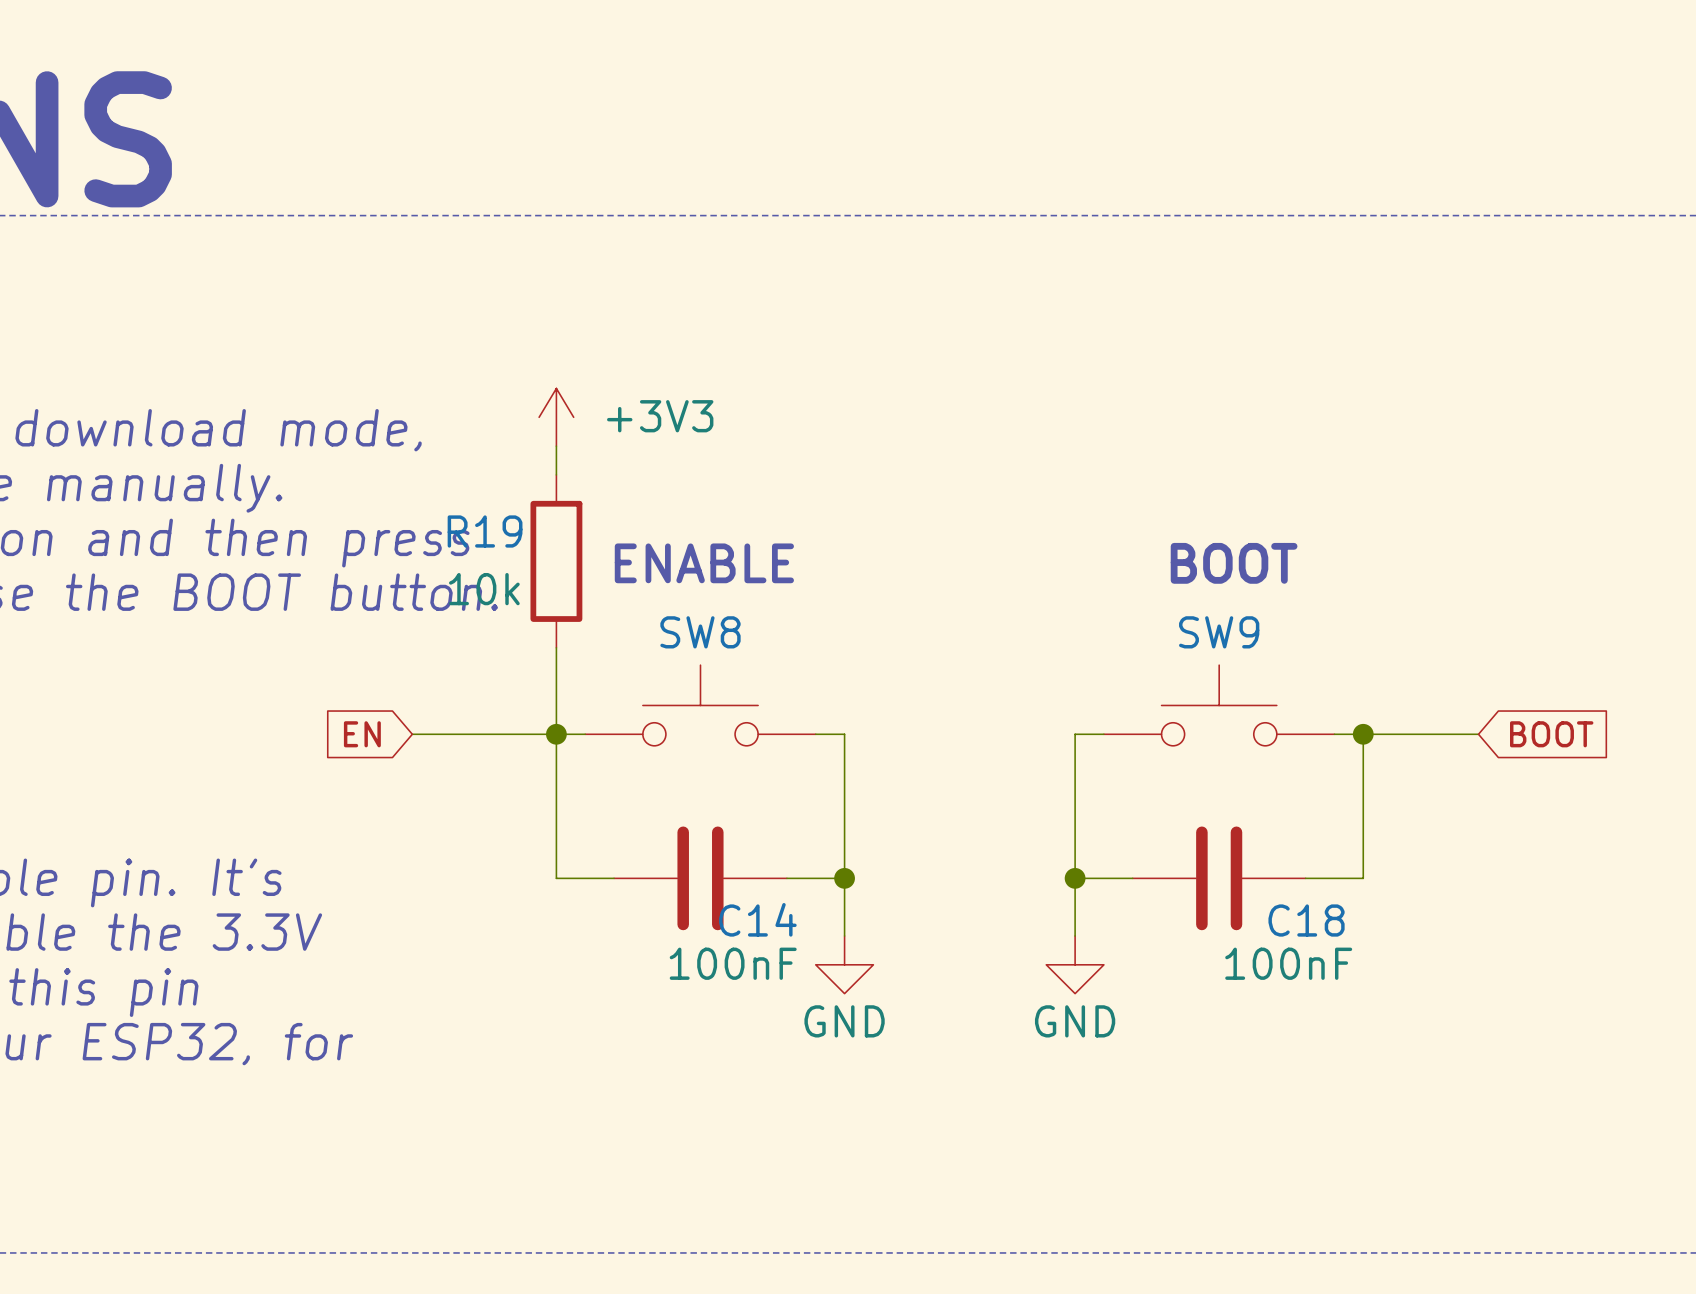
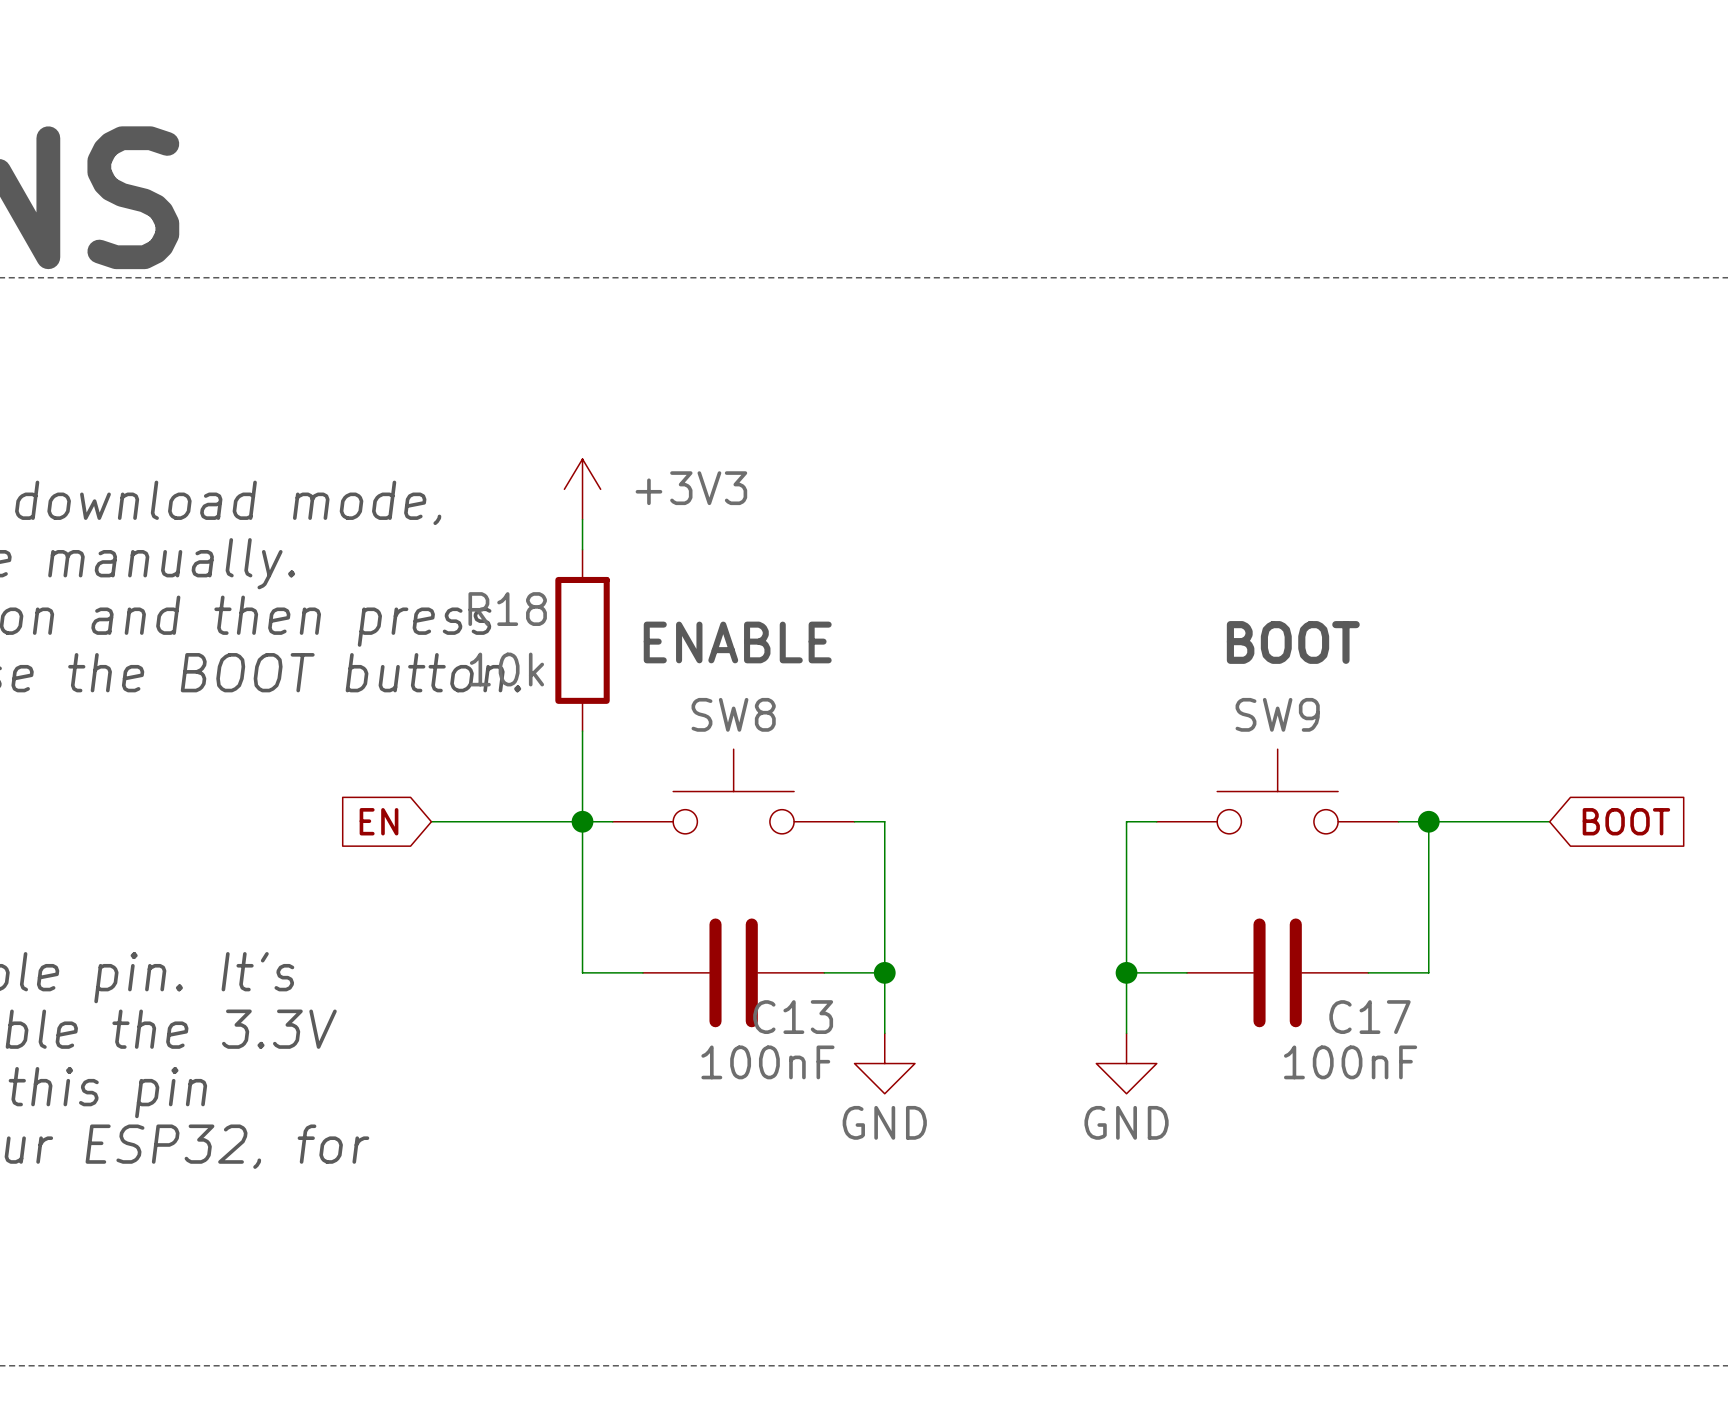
R19 name: R19 (485, 531) -> R18 (507, 609)
C14 name: C14 (757, 919) -> C13 (793, 1017)
C18 name: C18 (1306, 920) -> C17 (1369, 1017)

